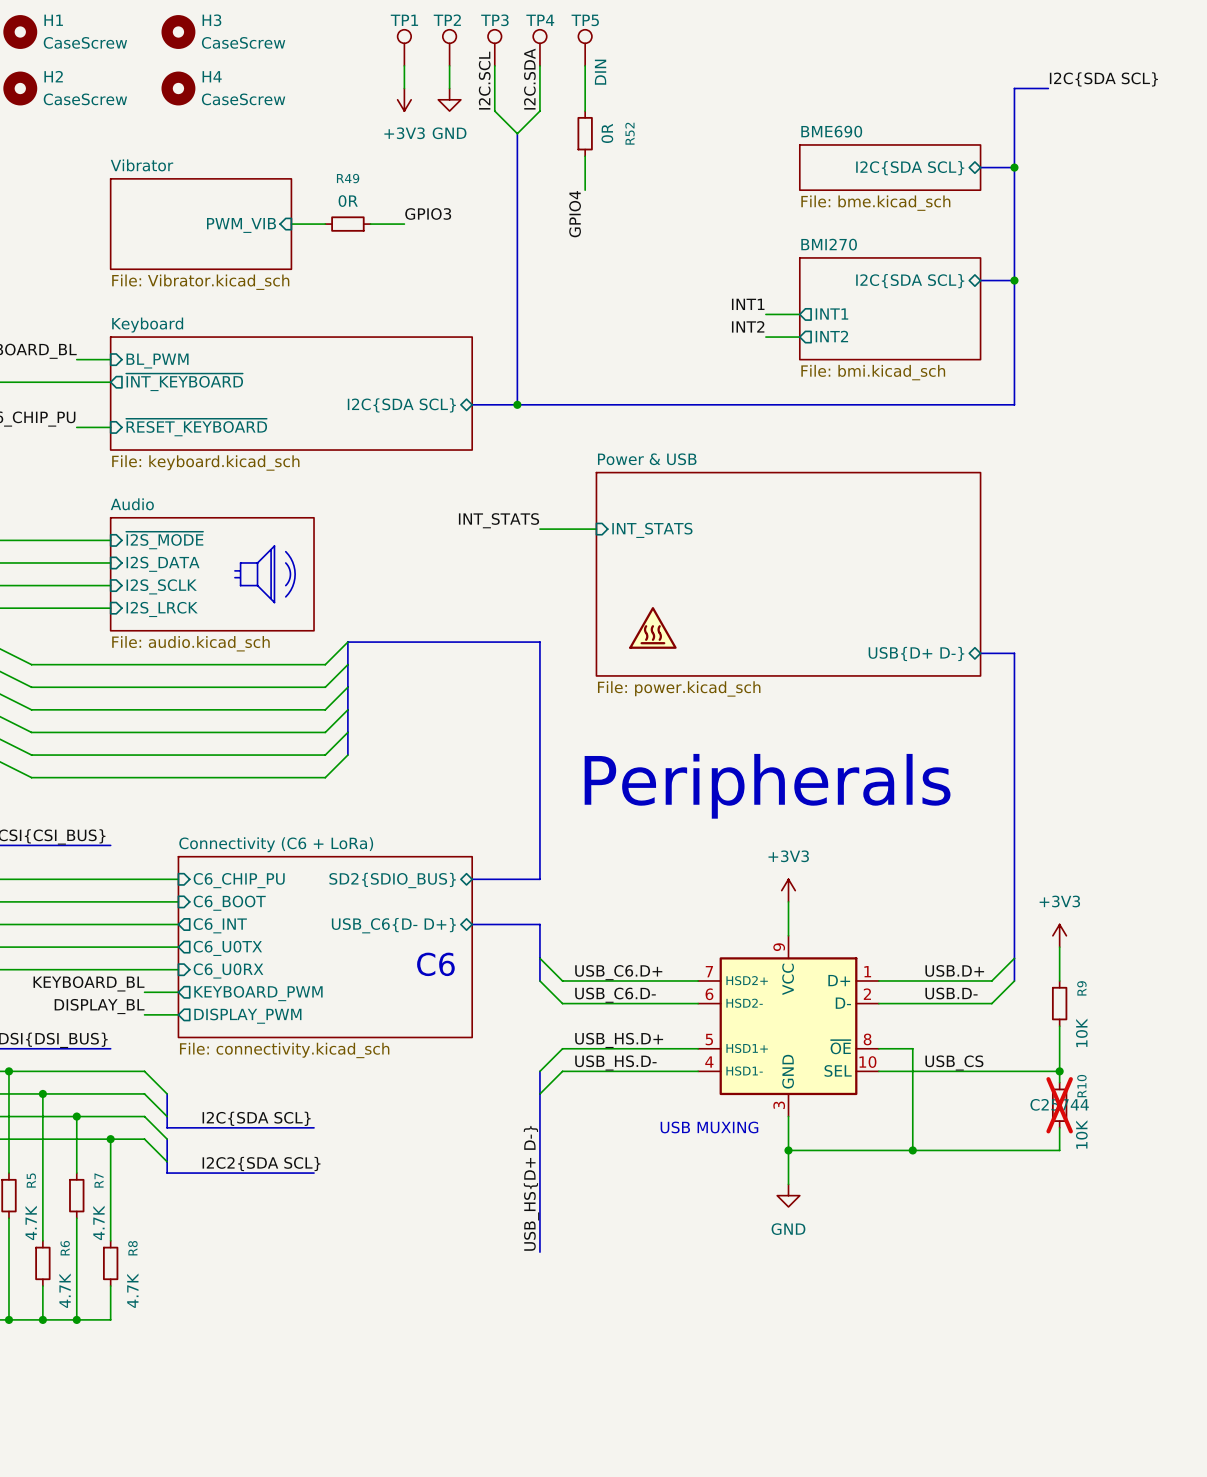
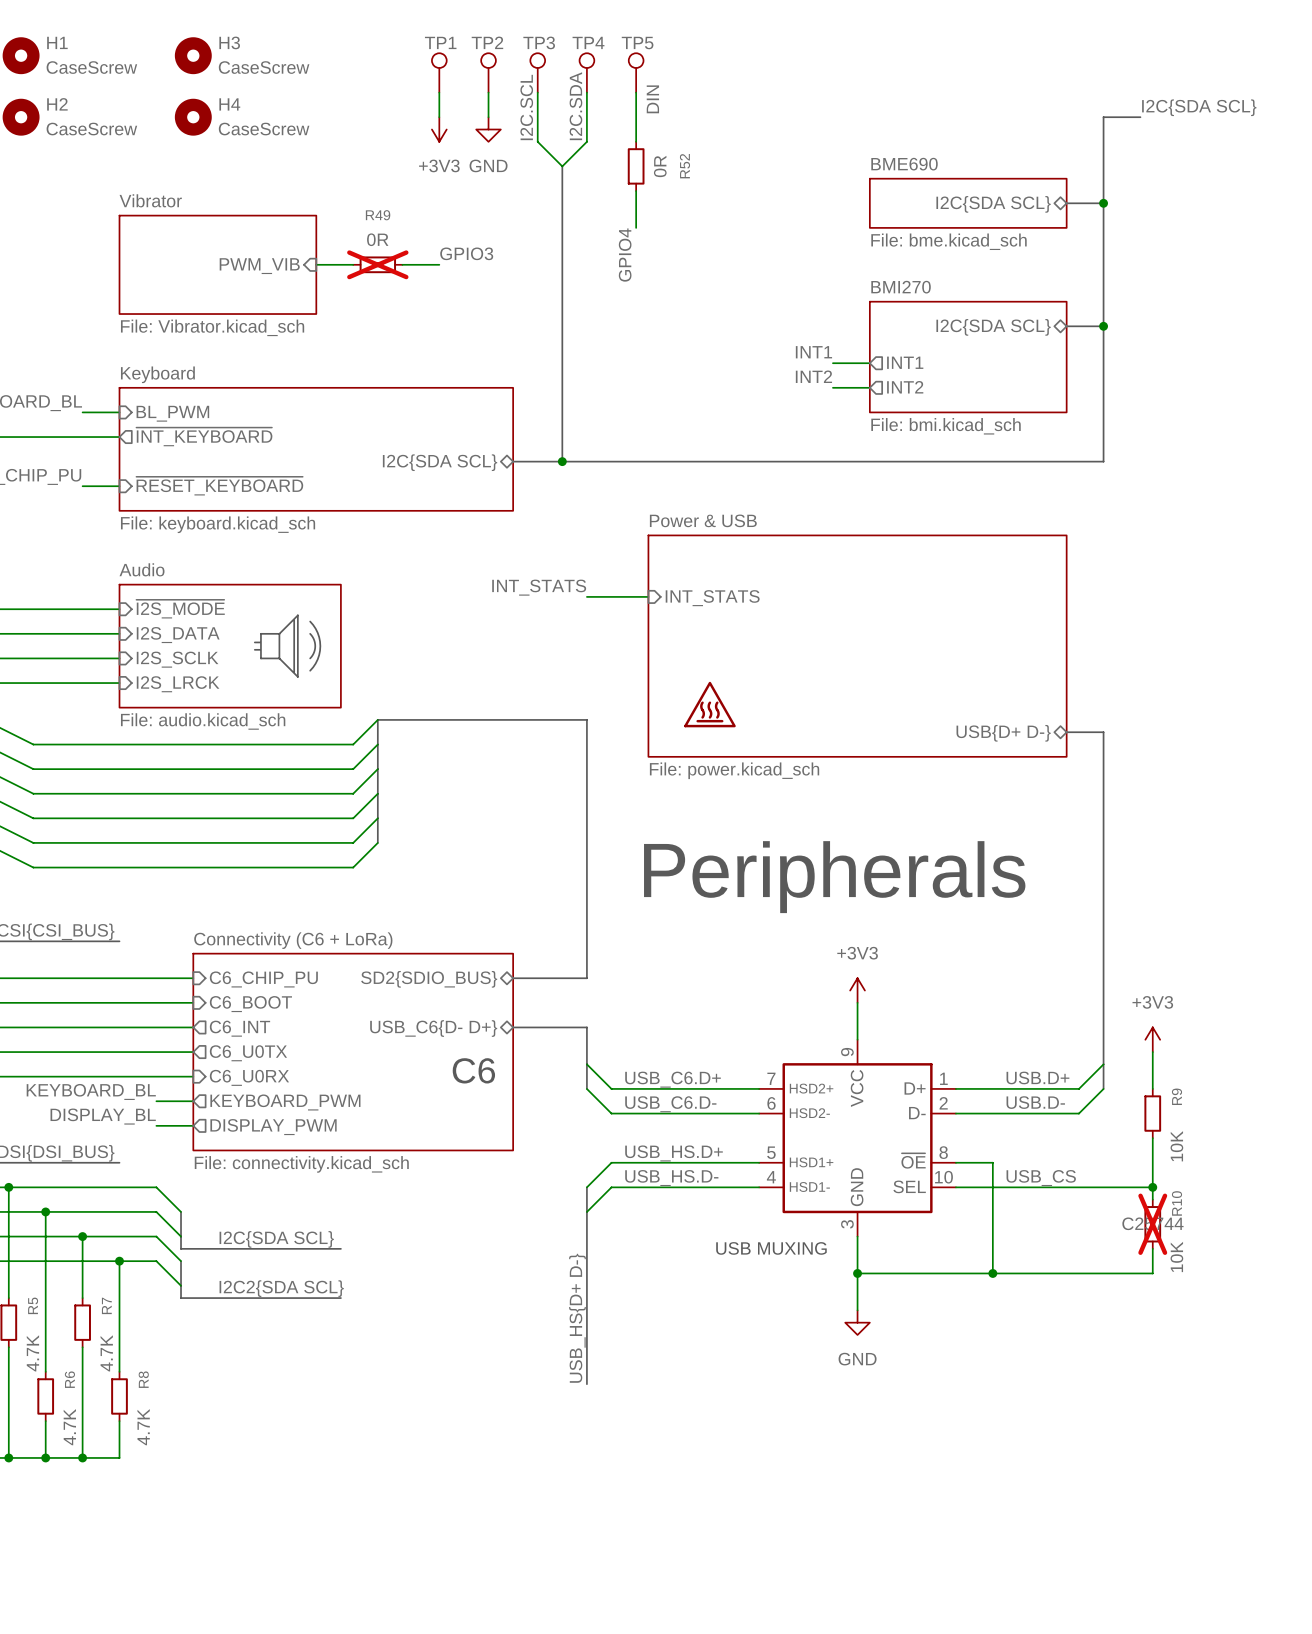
R49 do-not-place cross: none -> (377, 264)

